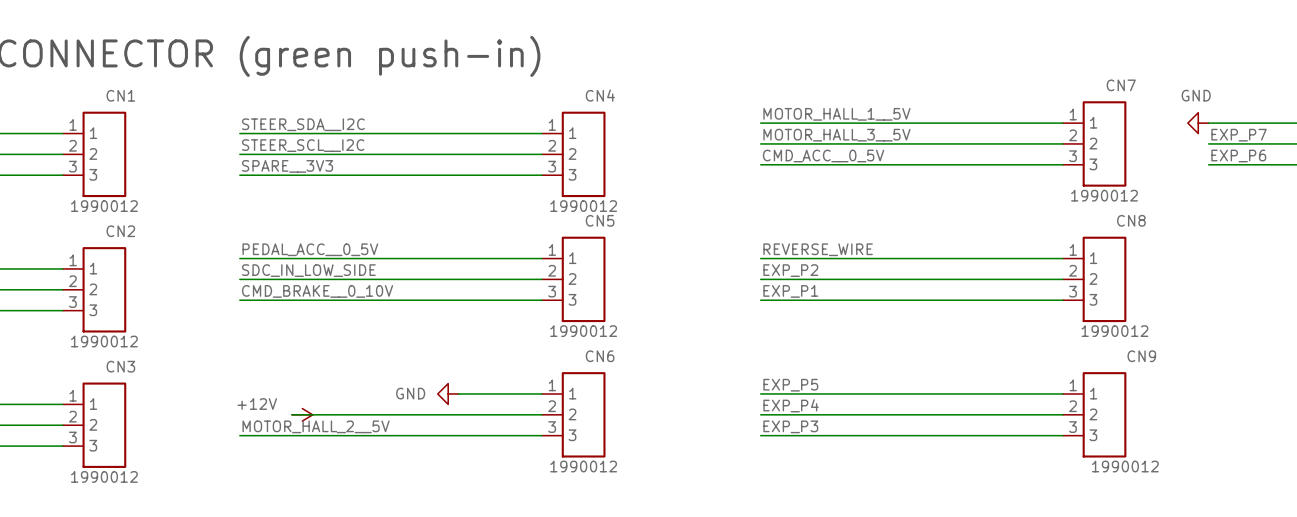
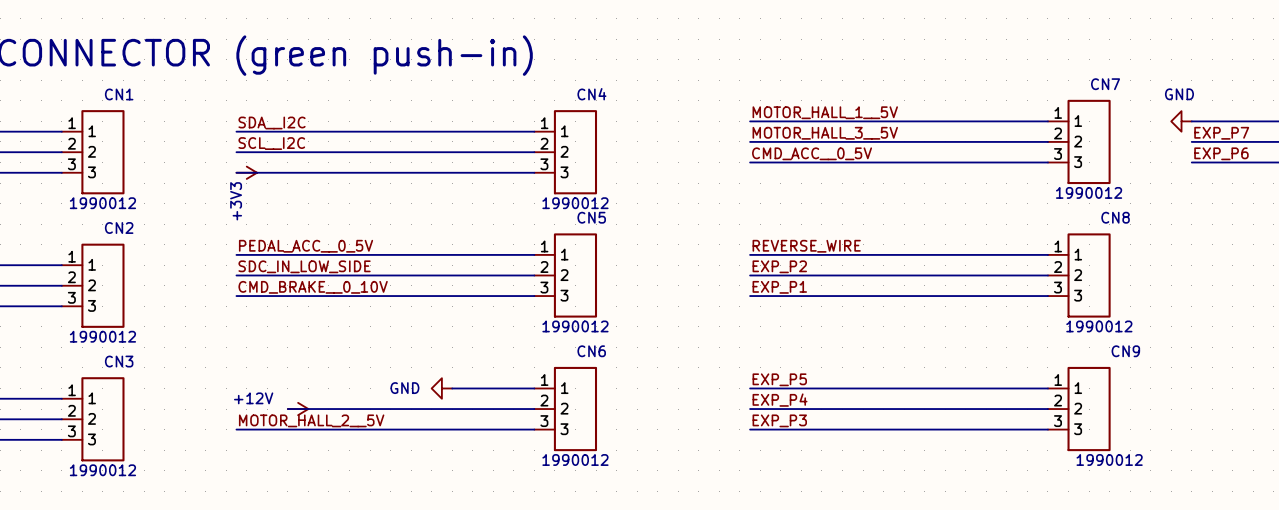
label: STEER_SDA__I2C (303, 124) -> SDA__I2C (272, 123)
label: STEER_SCL__I2C (303, 145) -> SCL__I2C (271, 143)
label: SPARE__3V3 (287, 166) -> none
power symbol: none -> +3V3 (246, 172)

